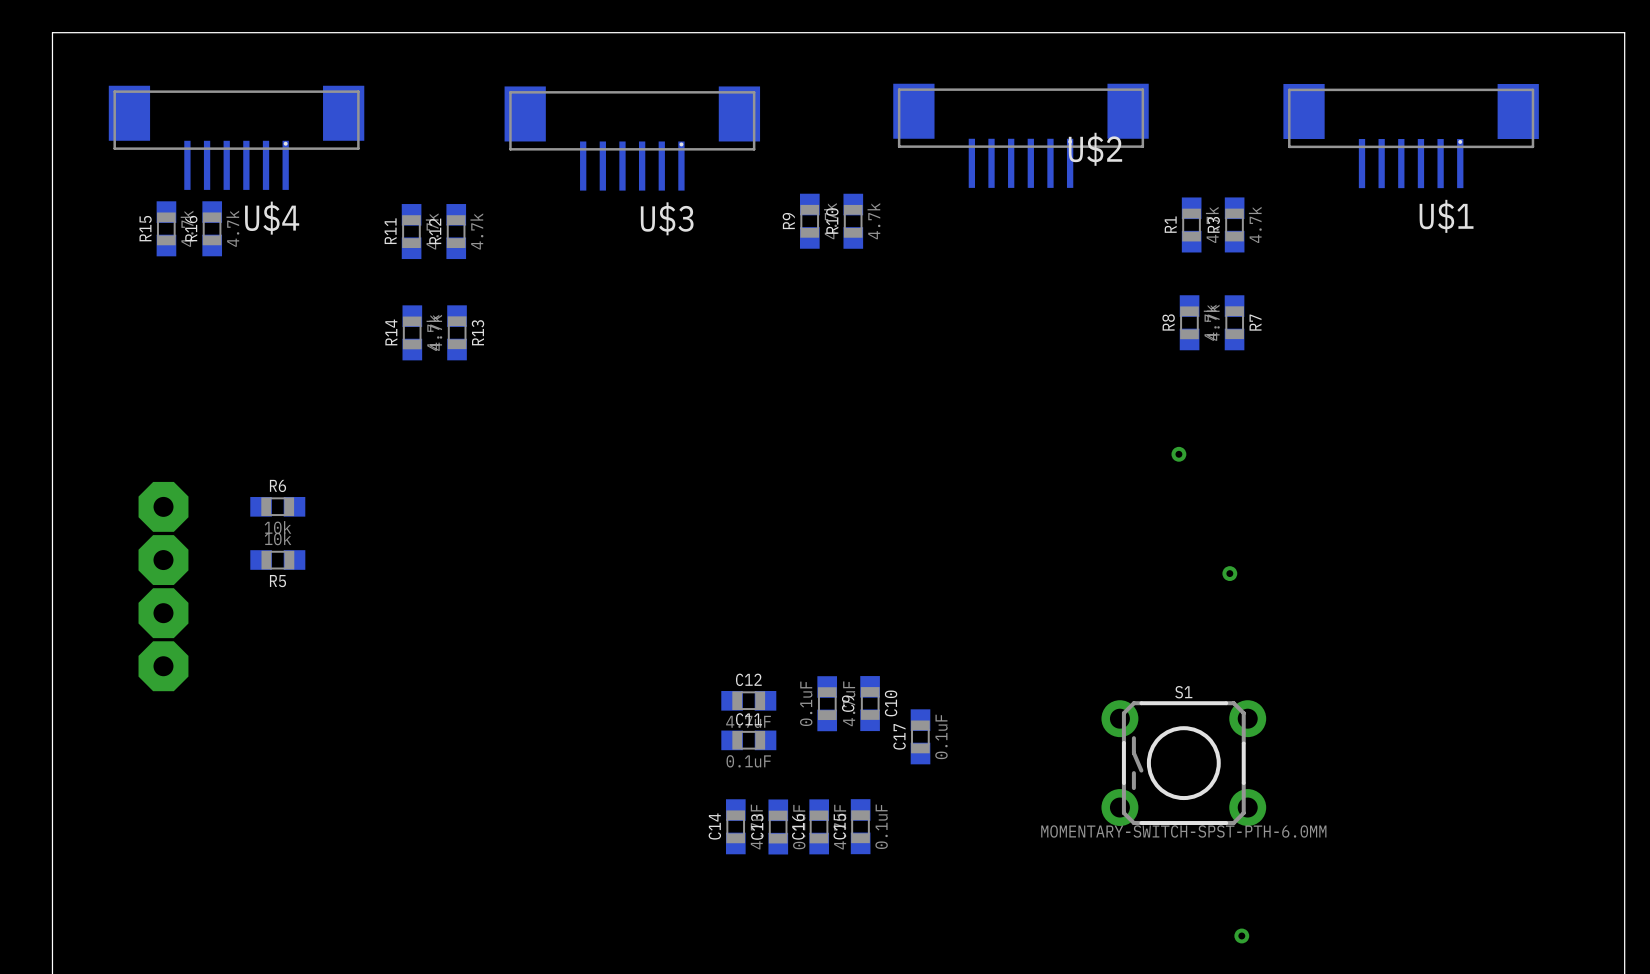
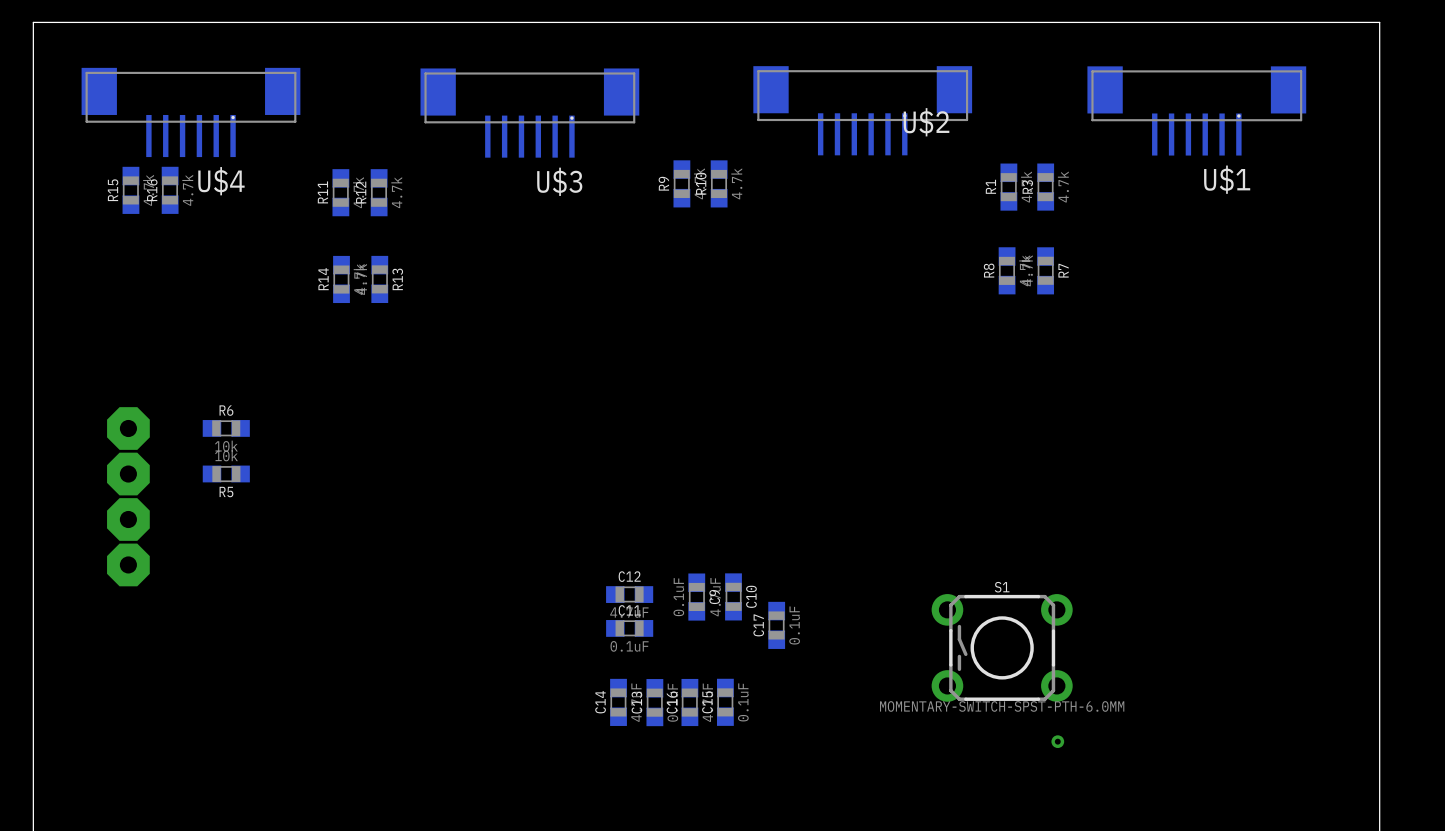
via: (1178, 454) -> none
via: (1229, 573) -> none
via: none -> (1057, 741)
via: (1241, 935) -> none

